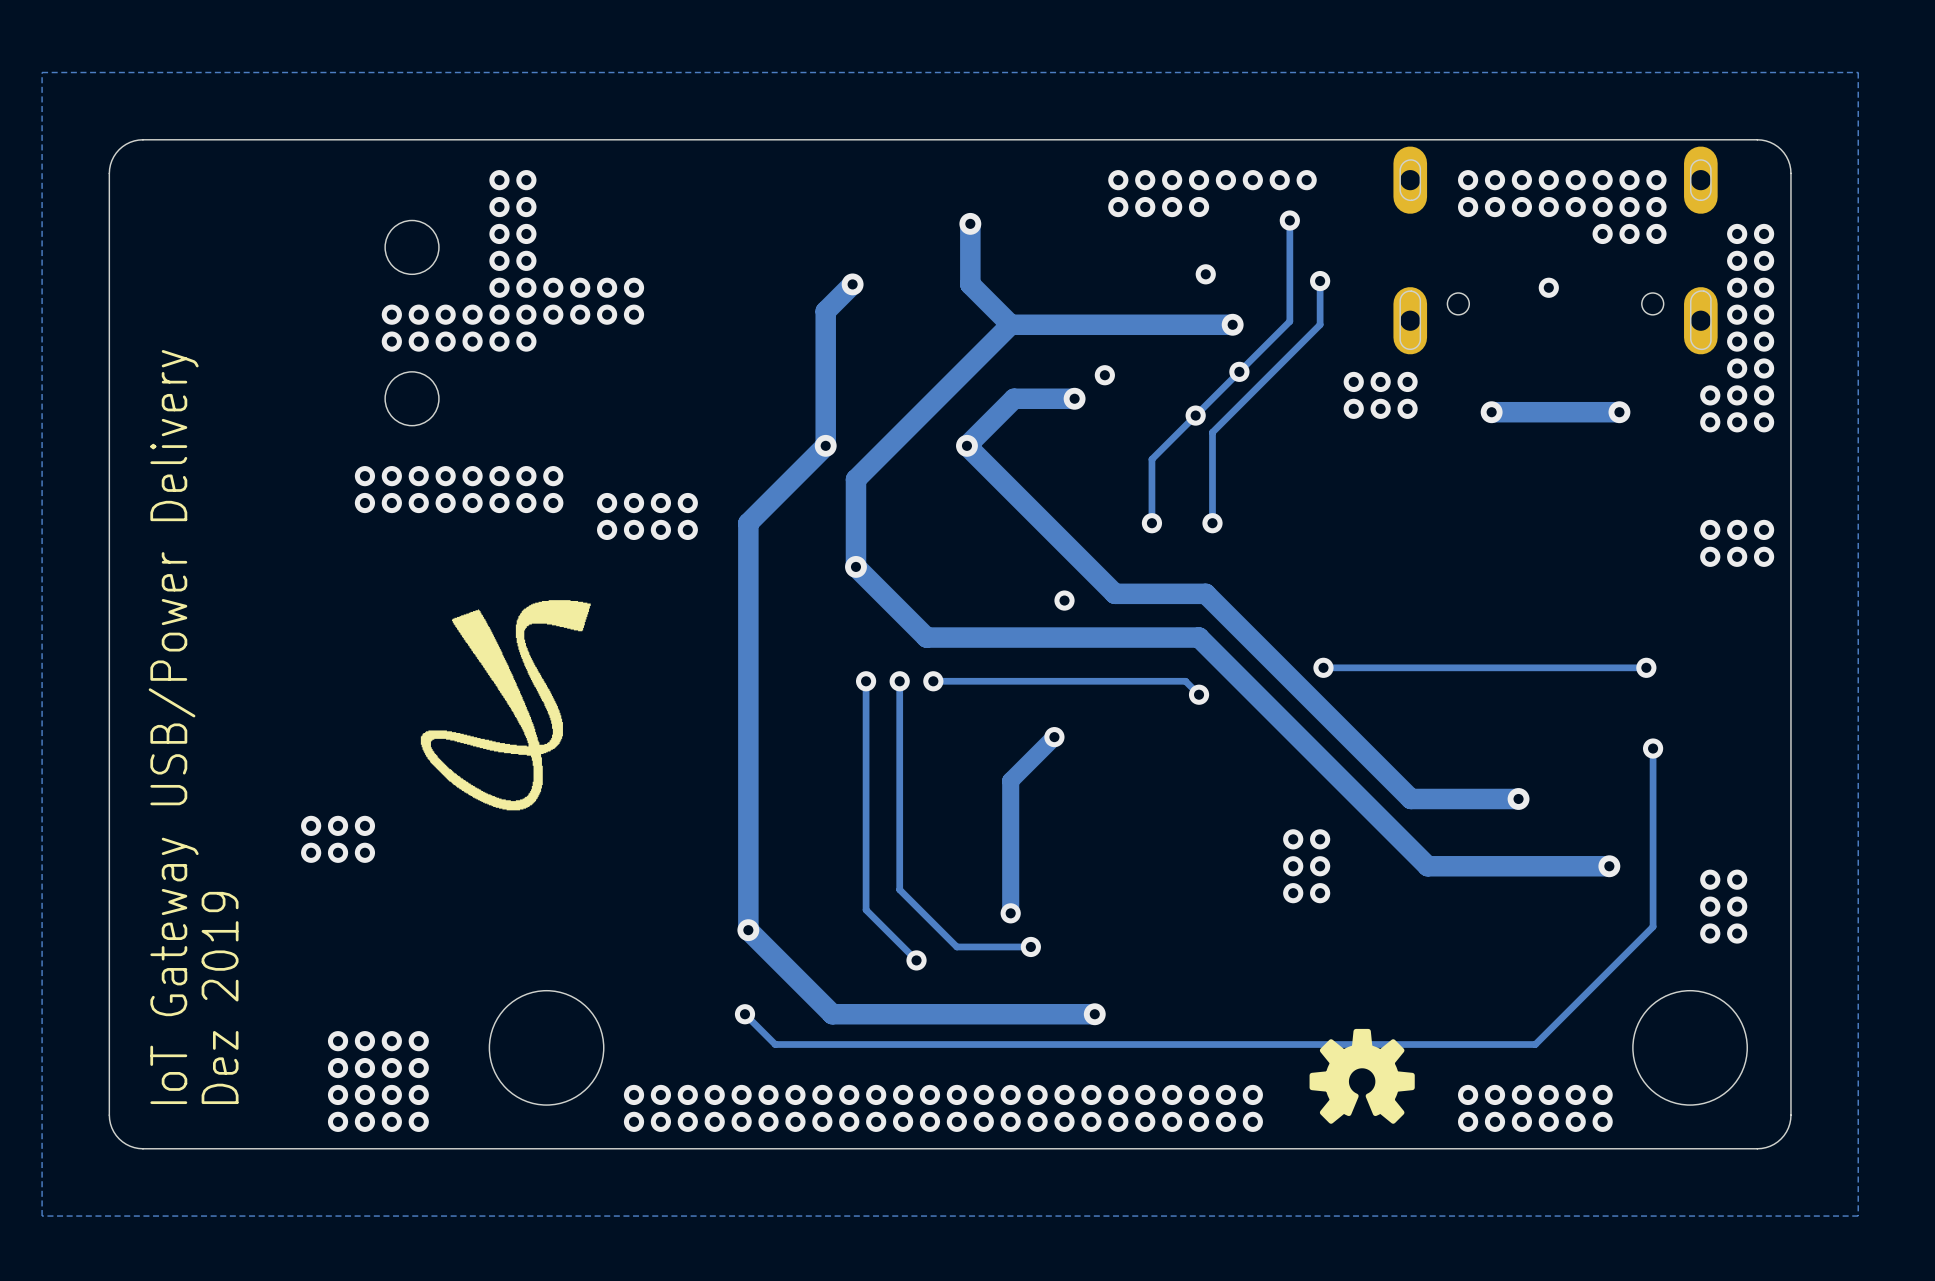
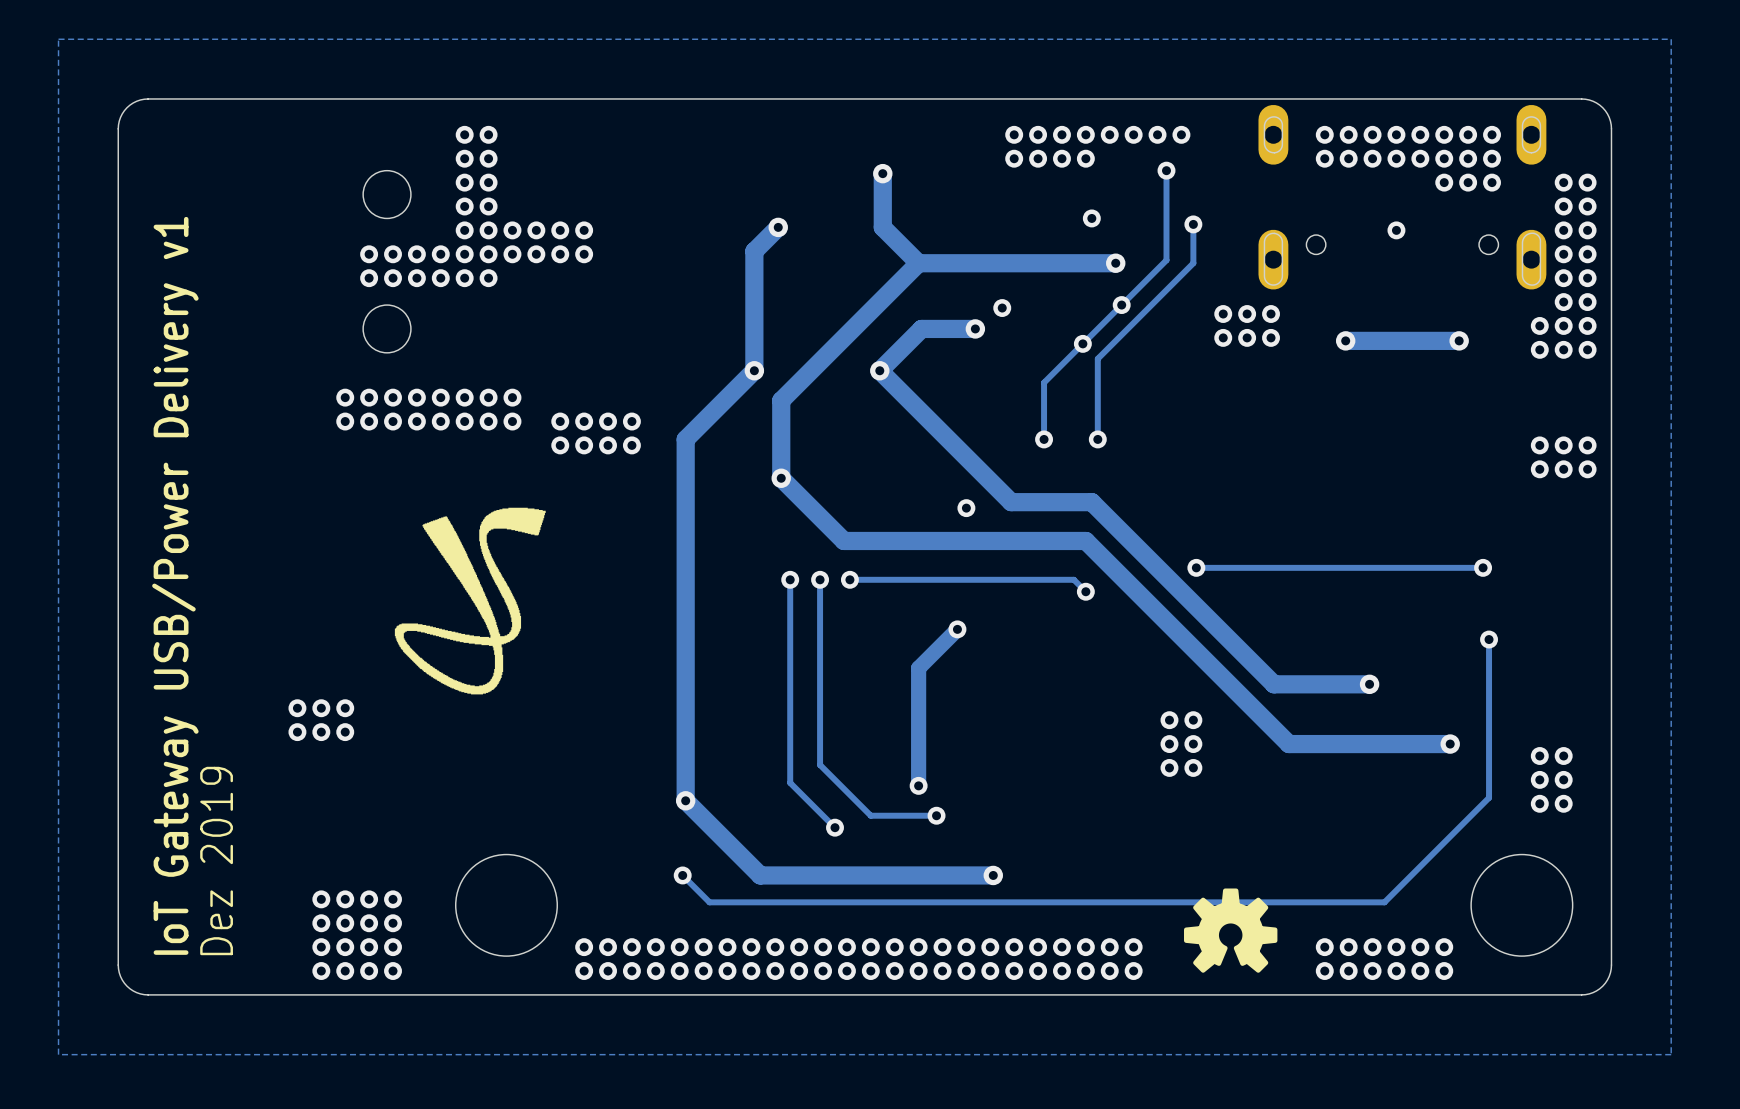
text: IoT Gateway USB/Power Delivery (173, 727) -> IoT Gateway USB/Power Delivery v1 (175, 585)

